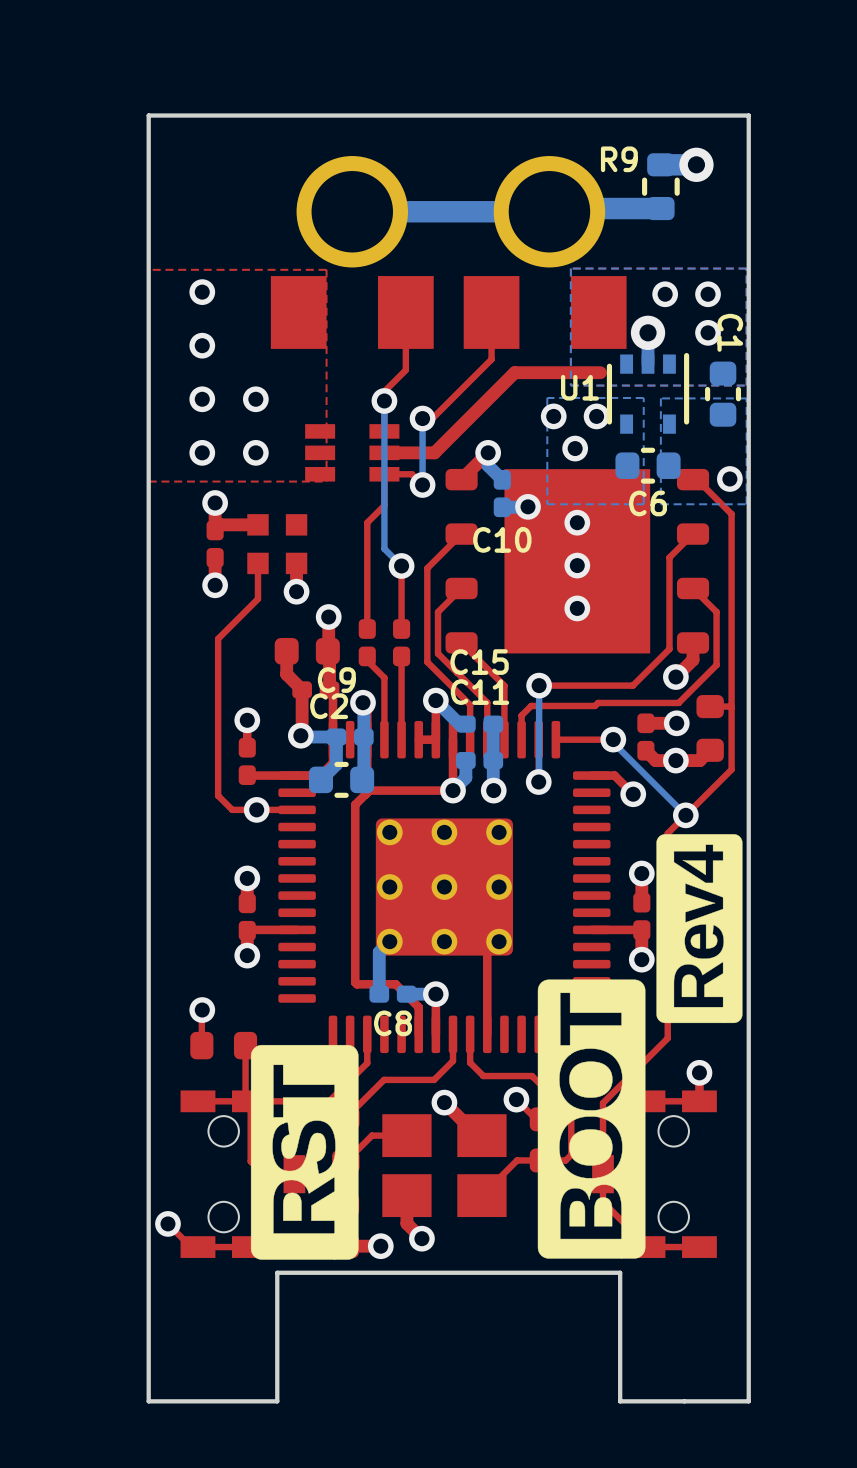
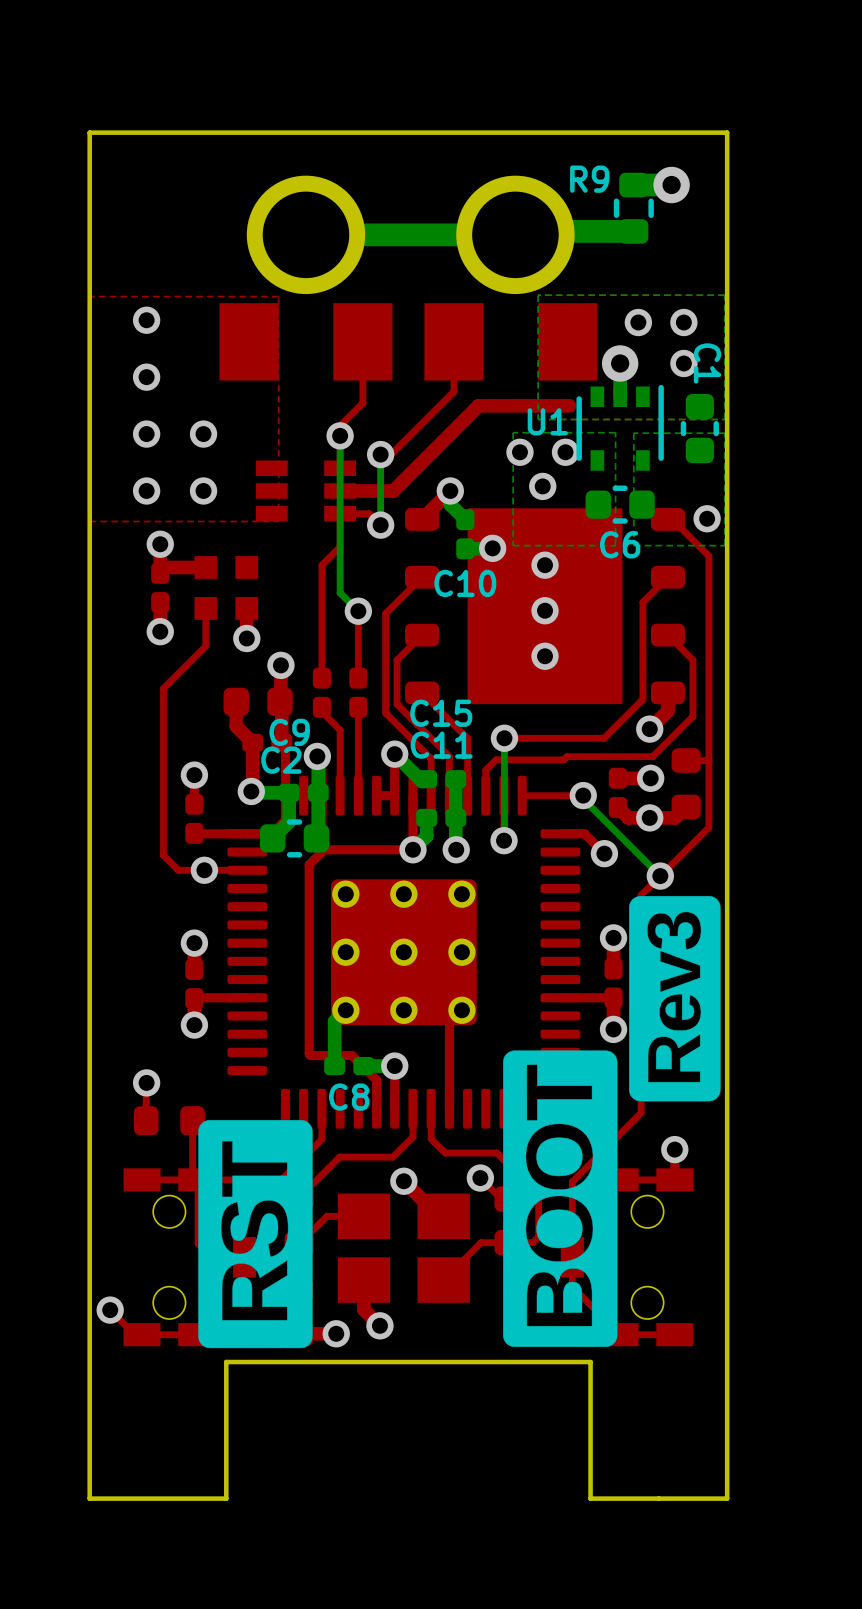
drawing shape: [656, 834, 743, 1024] -> [629, 895, 721, 1102]
drawing: [682, 860, 706, 876] -> none

